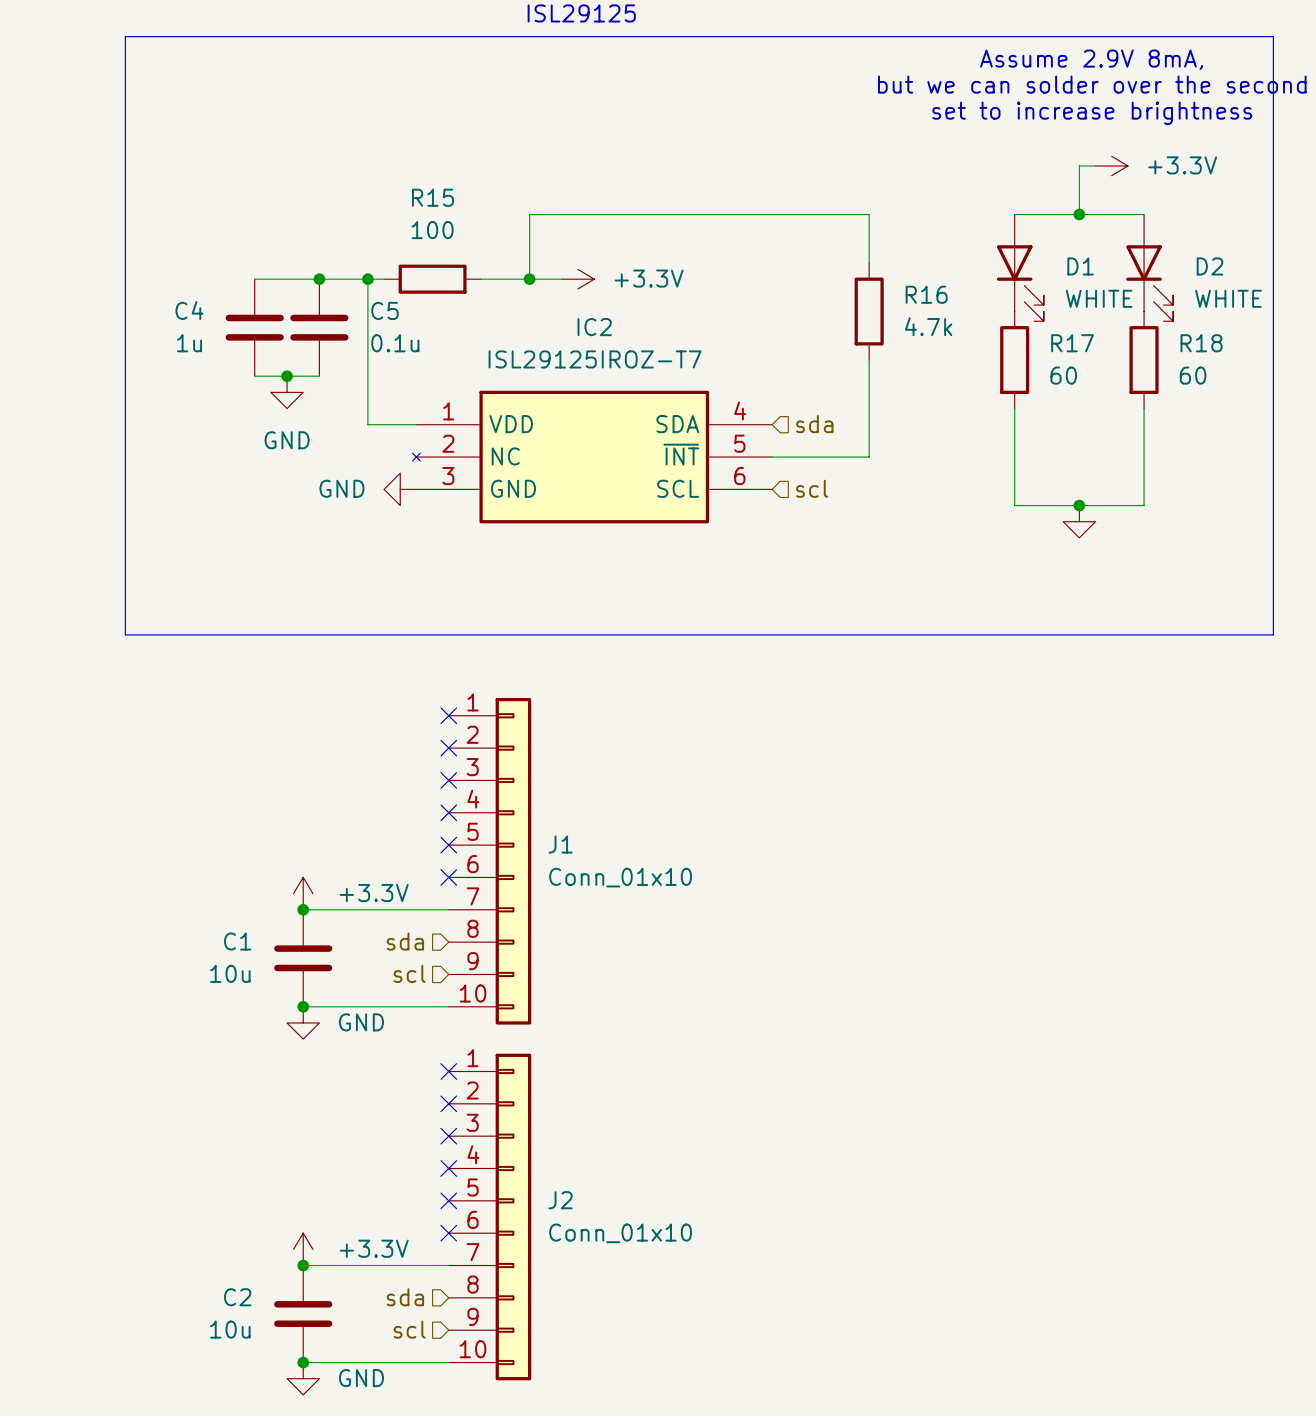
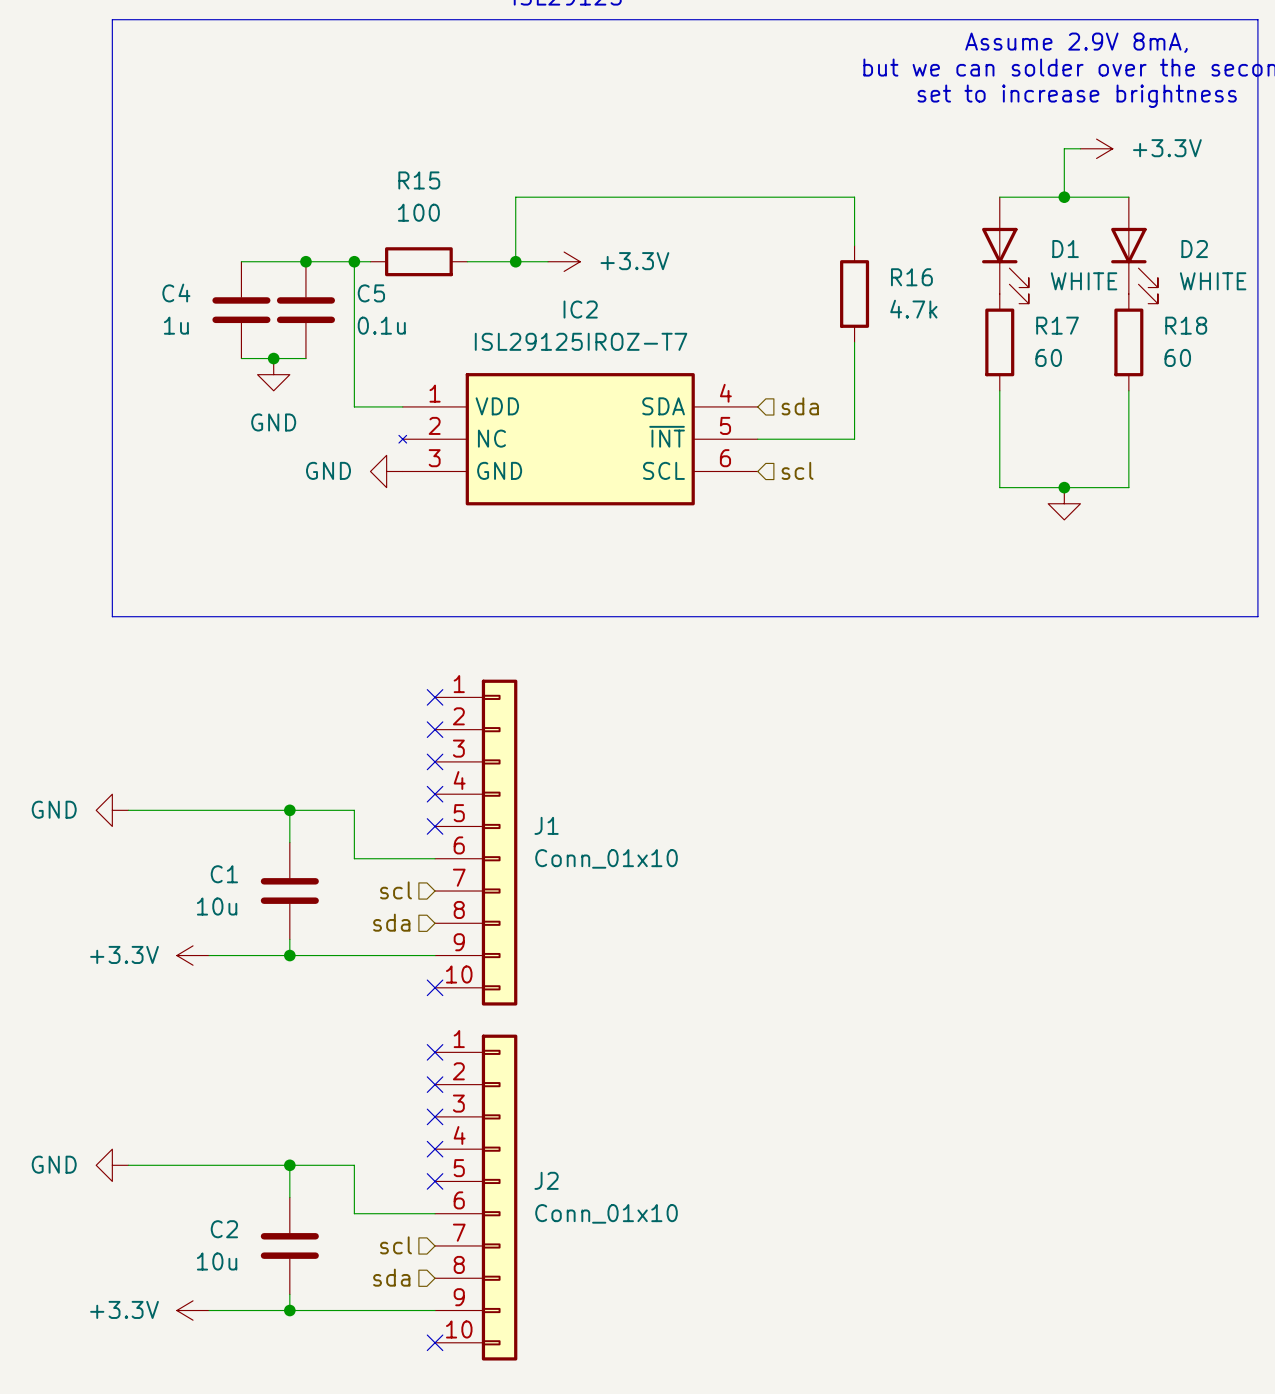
power symbol: none -> GND (112, 810)
wire: none -> (128, 810) (354, 810) (354, 858) (435, 858)
wire: none -> (289, 810) (289, 842)
junction: none -> (289, 810)
no-connect mark: (448, 877) -> none
power symbol rotation: 0° (303, 893) -> 90° counterclockwise (193, 955)
power symbol position: +3.3V (303, 893) -> +3.3V (193, 955)
power symbol text position: +3.3V (374, 893) -> +3.3V (124, 954)
wire: (303, 909) (448, 909) -> none
junction: (303, 909) -> none
C1 position: (303, 958) -> (289, 891)
hierarchical label position: scl (409, 973) -> scl (395, 890)
wire: none -> (209, 955) (435, 955)
junction: none -> (289, 955)
wire: (303, 1006) (448, 1006) -> none
junction: (303, 1006) -> none
no-connect mark: none -> (435, 987)
power symbol: GND (303, 1022) -> none
power symbol: none -> GND (112, 1165)
wire: none -> (128, 1165) (354, 1165) (354, 1213) (435, 1213)
wire: none -> (289, 1165) (289, 1197)
junction: none -> (289, 1165)
no-connect mark: (448, 1233) -> none
power symbol text position: +3.3V (374, 1248) -> +3.3V (124, 1309)
power symbol rotation: 0° (303, 1249) -> 90° counterclockwise (193, 1310)
power symbol position: +3.3V (303, 1249) -> +3.3V (193, 1310)
wire: (303, 1265) (448, 1265) -> none
junction: (303, 1265) -> none
C2 position: (303, 1314) -> (289, 1245)
hierarchical label position: scl (409, 1329) -> scl (395, 1245)
wire: none -> (209, 1310) (435, 1310)
junction: none -> (289, 1310)
wire: (303, 1362) (448, 1362) -> none
junction: (303, 1362) -> none
no-connect mark: none -> (435, 1342)
power symbol: GND (303, 1378) -> none

